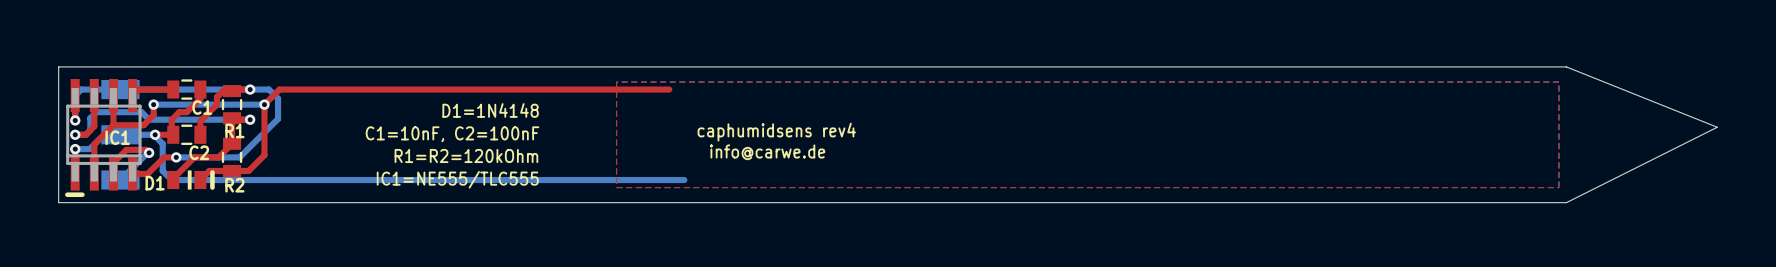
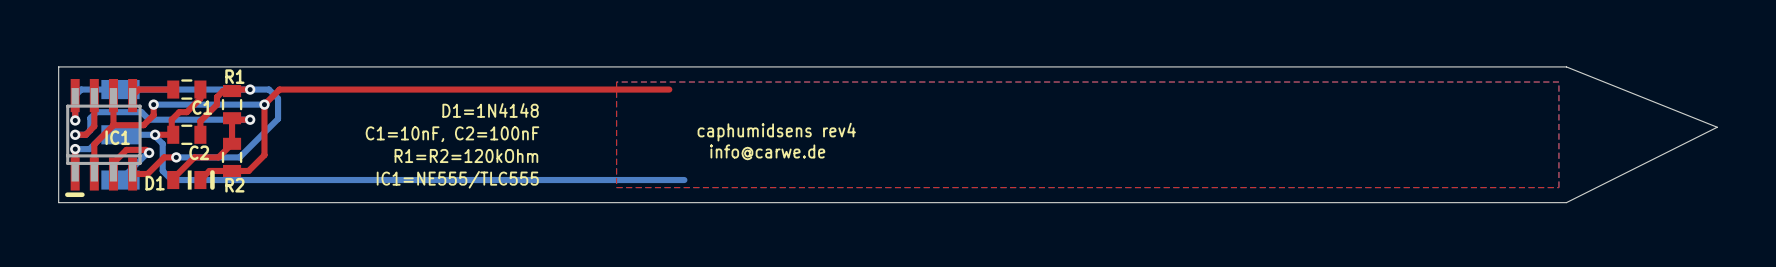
text position: R1 (234, 130) -> R1 (234, 76)

